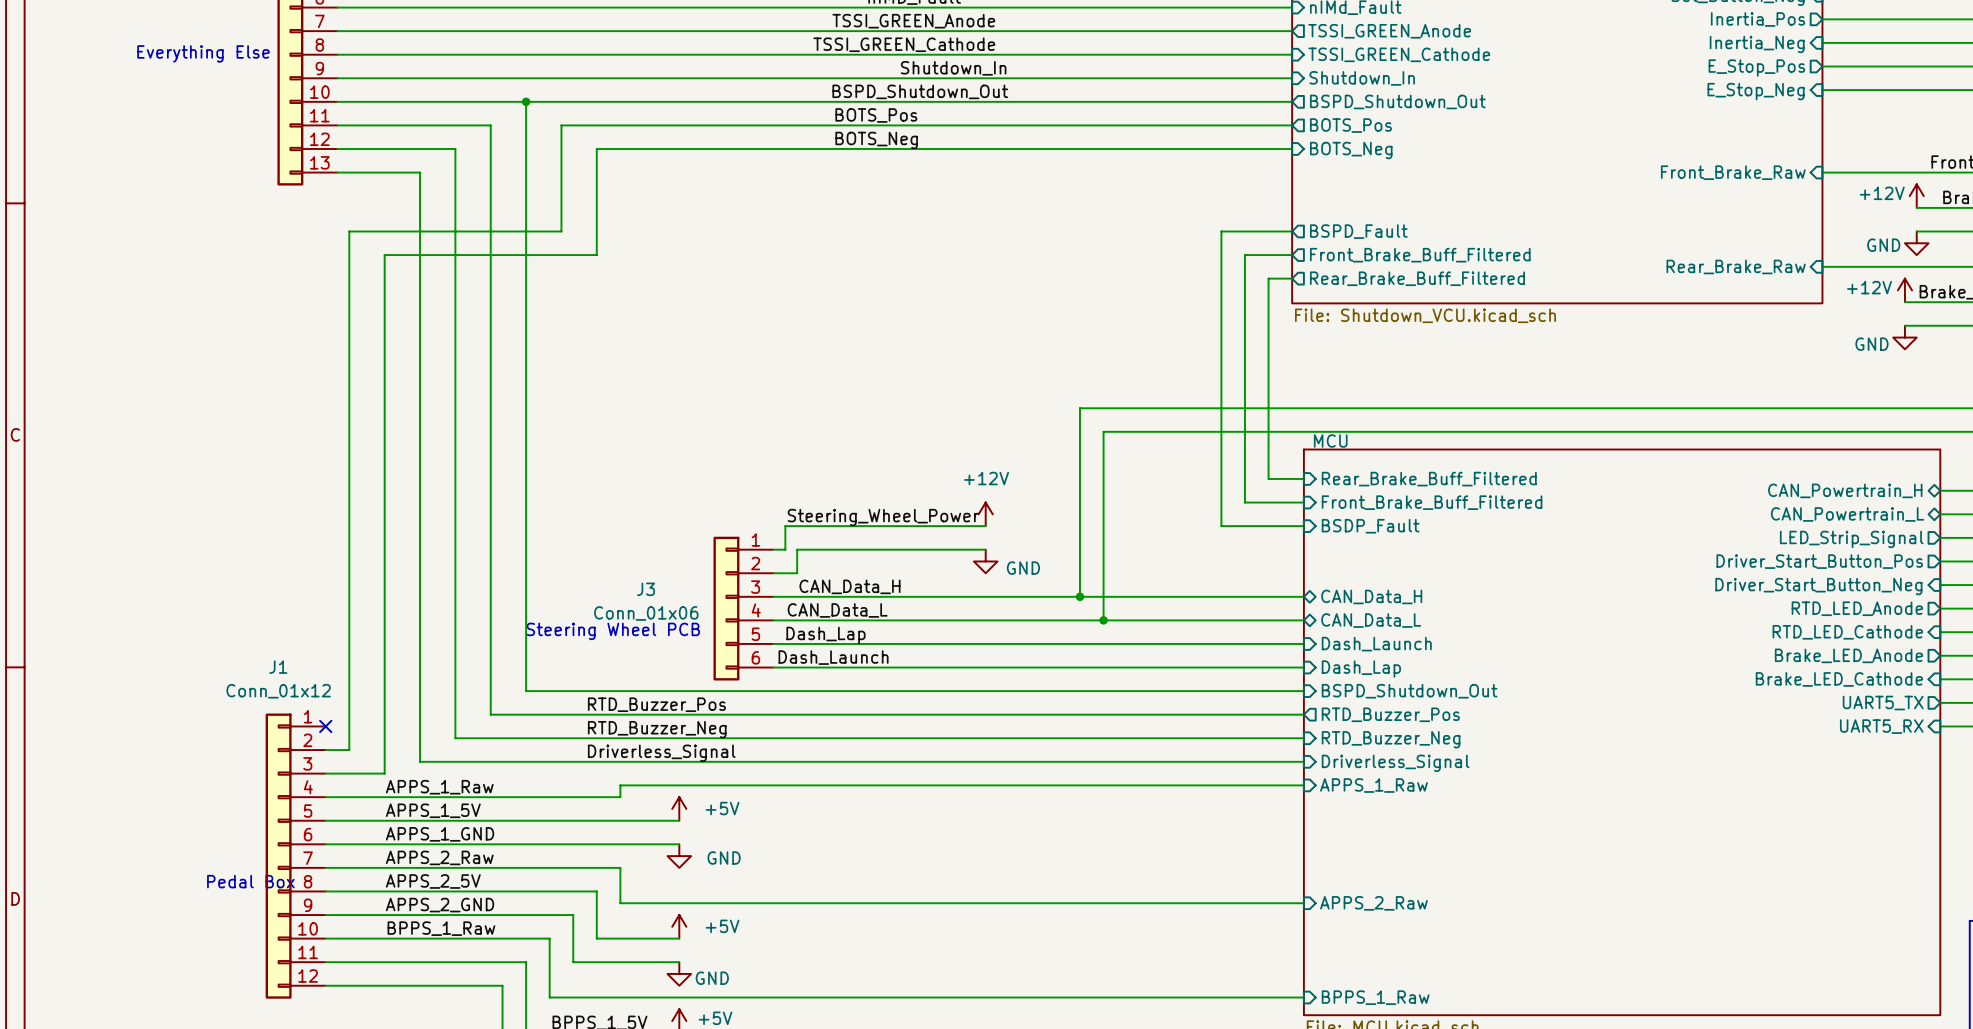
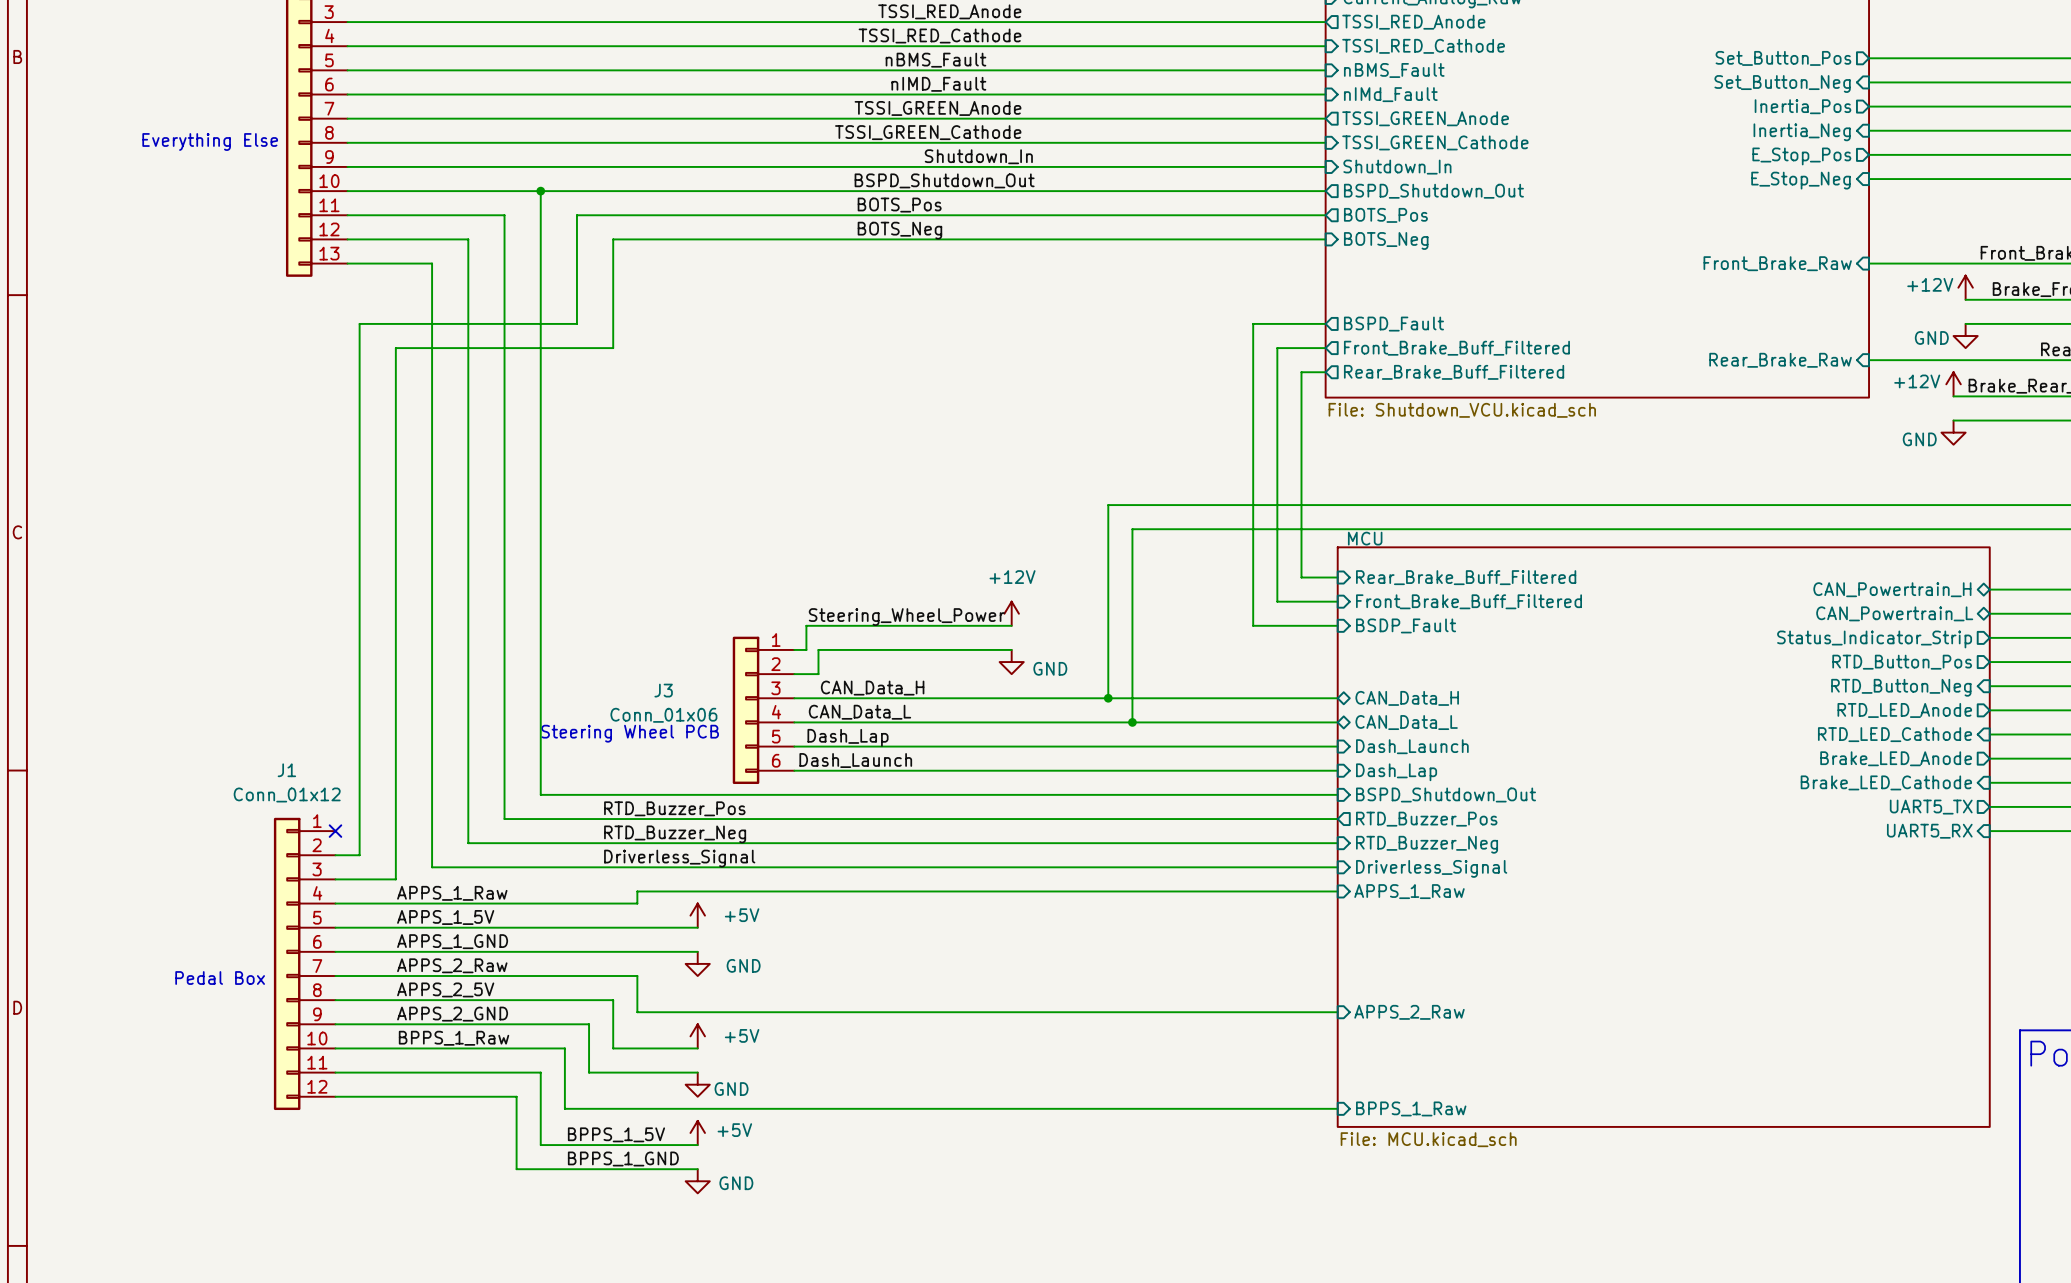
sheet pin: LED_Strip_Signal (1851, 539) -> Status_Indicator_Strip (1874, 639)
sheet pin: Driver_Start_Button_Pos (1819, 561) -> RTD_Button_Pos (1902, 662)
sheet pin: Driver_Start_Button_Neg (1818, 586) -> RTD_Button_Neg (1901, 687)
text position: Pedal Box (250, 881) -> Pedal Box (220, 978)

